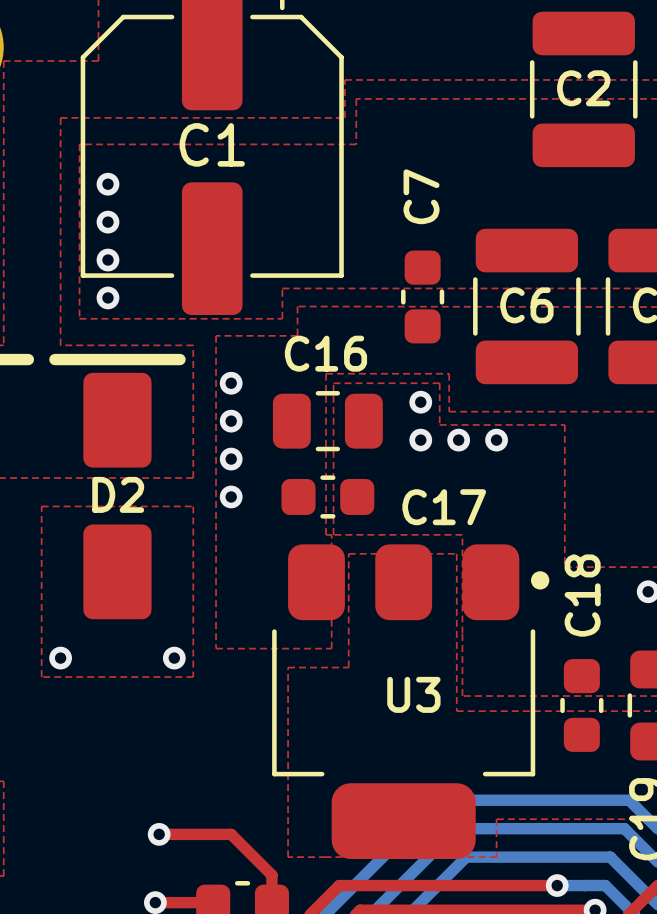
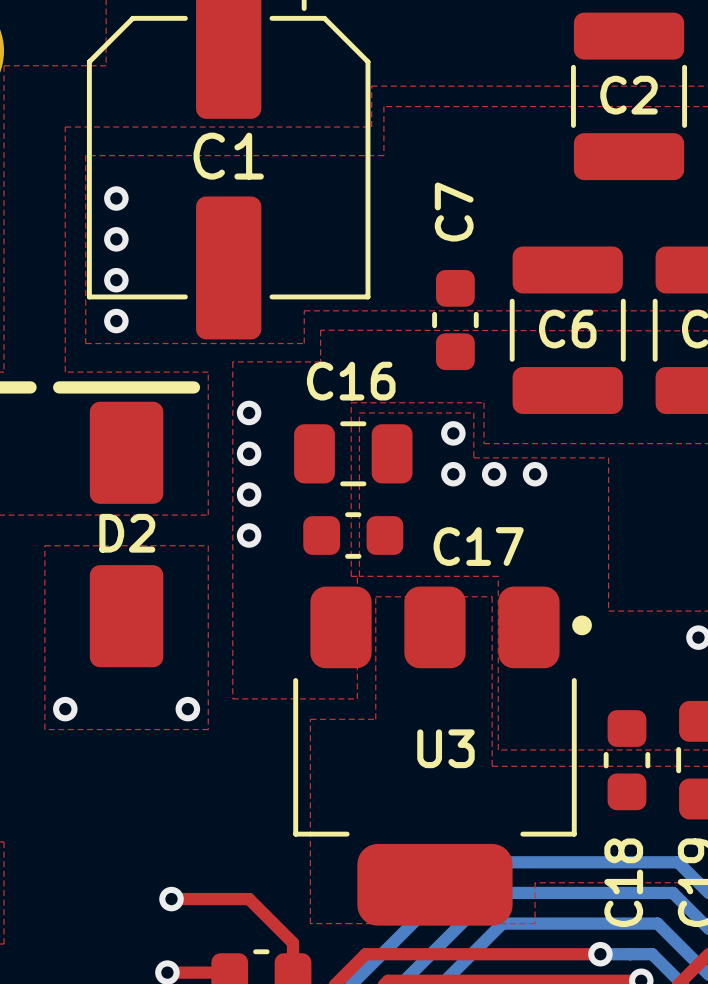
C18 name position: C18 (582, 595) -> C18 (623, 882)

